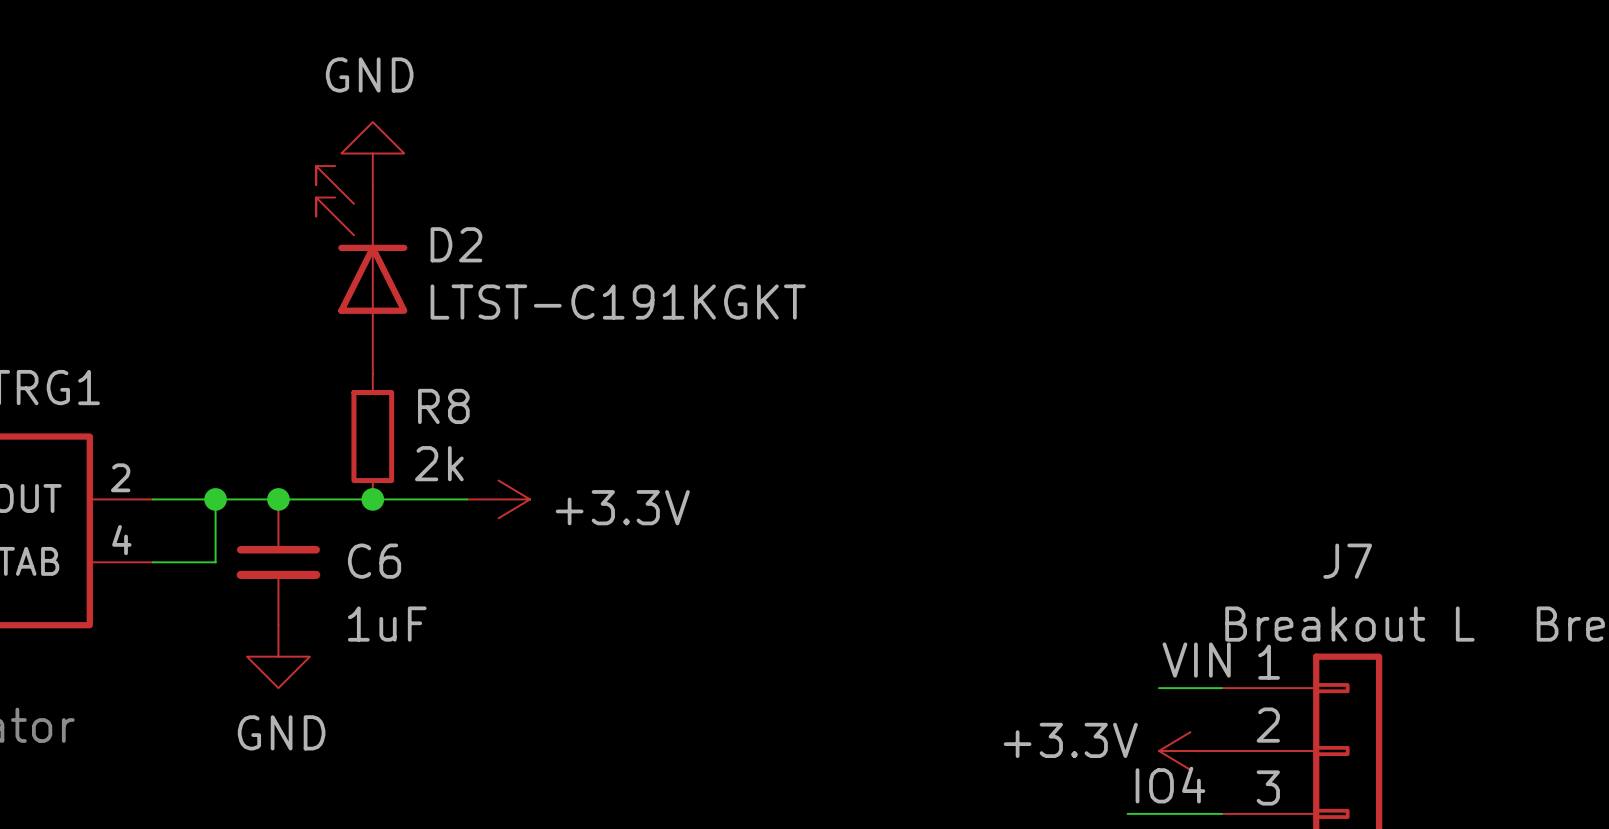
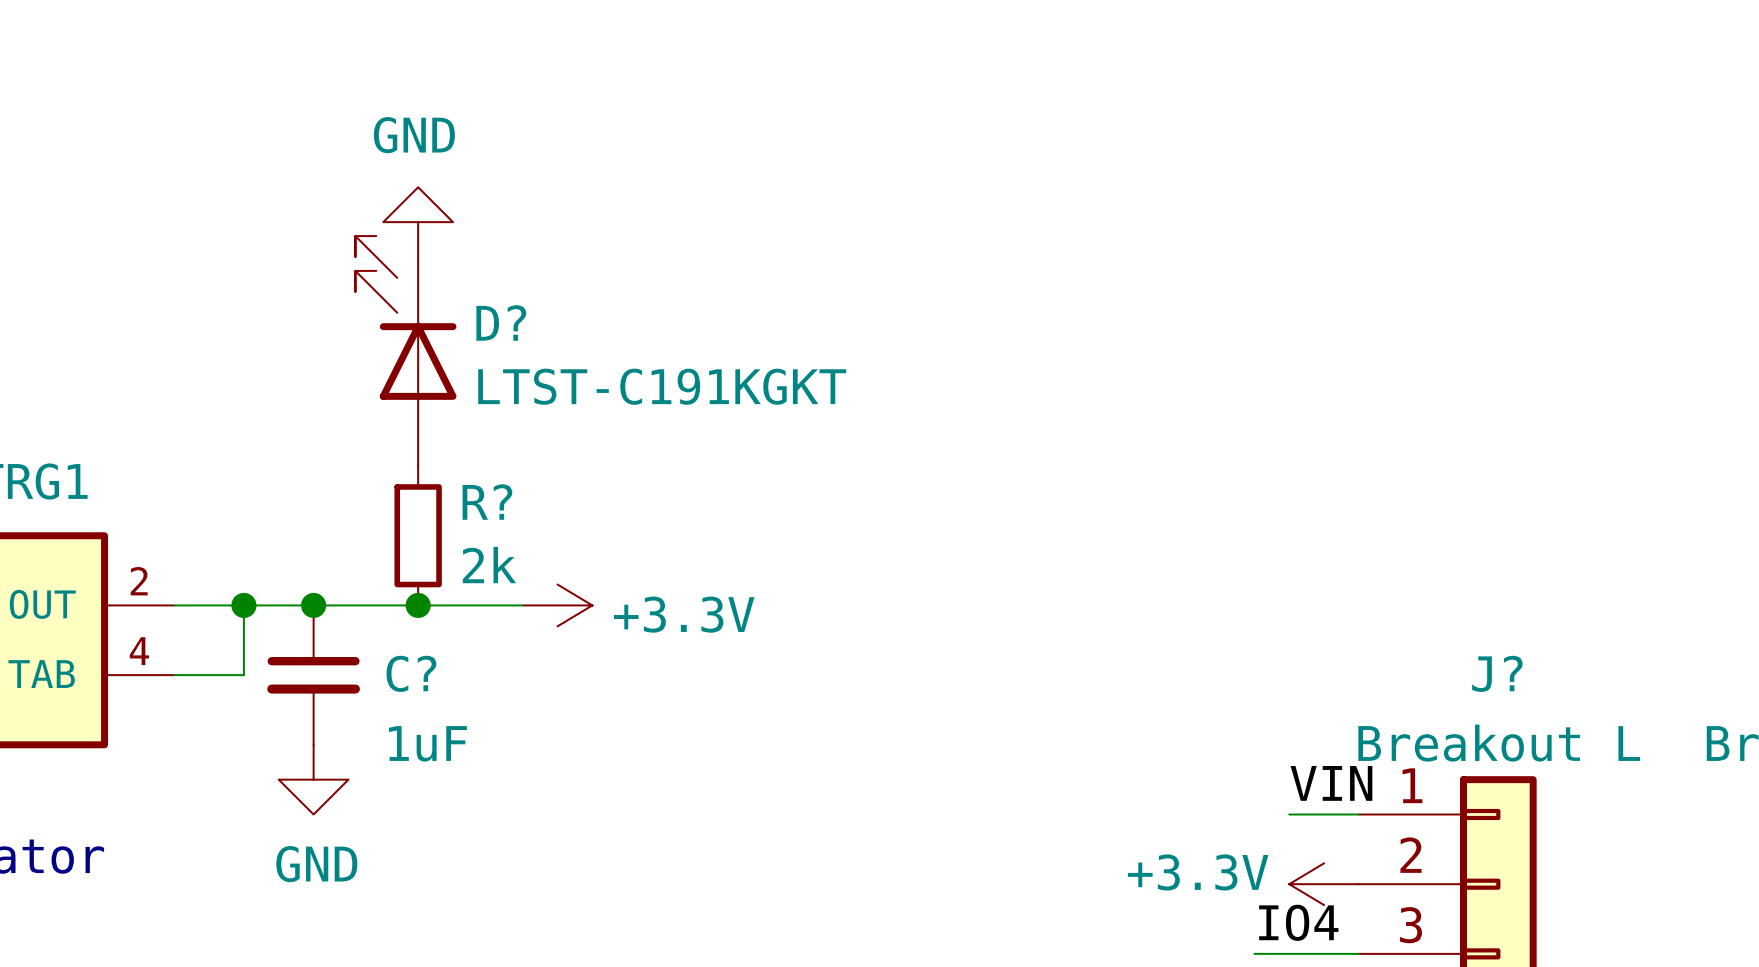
D2 name: D2 (456, 244) -> D? (501, 322)
R8 name: R8 (443, 406) -> R? (487, 502)
C6 name: C6 (374, 561) -> C? (411, 673)
J7 name: J7 (1347, 561) -> J? (1497, 673)

